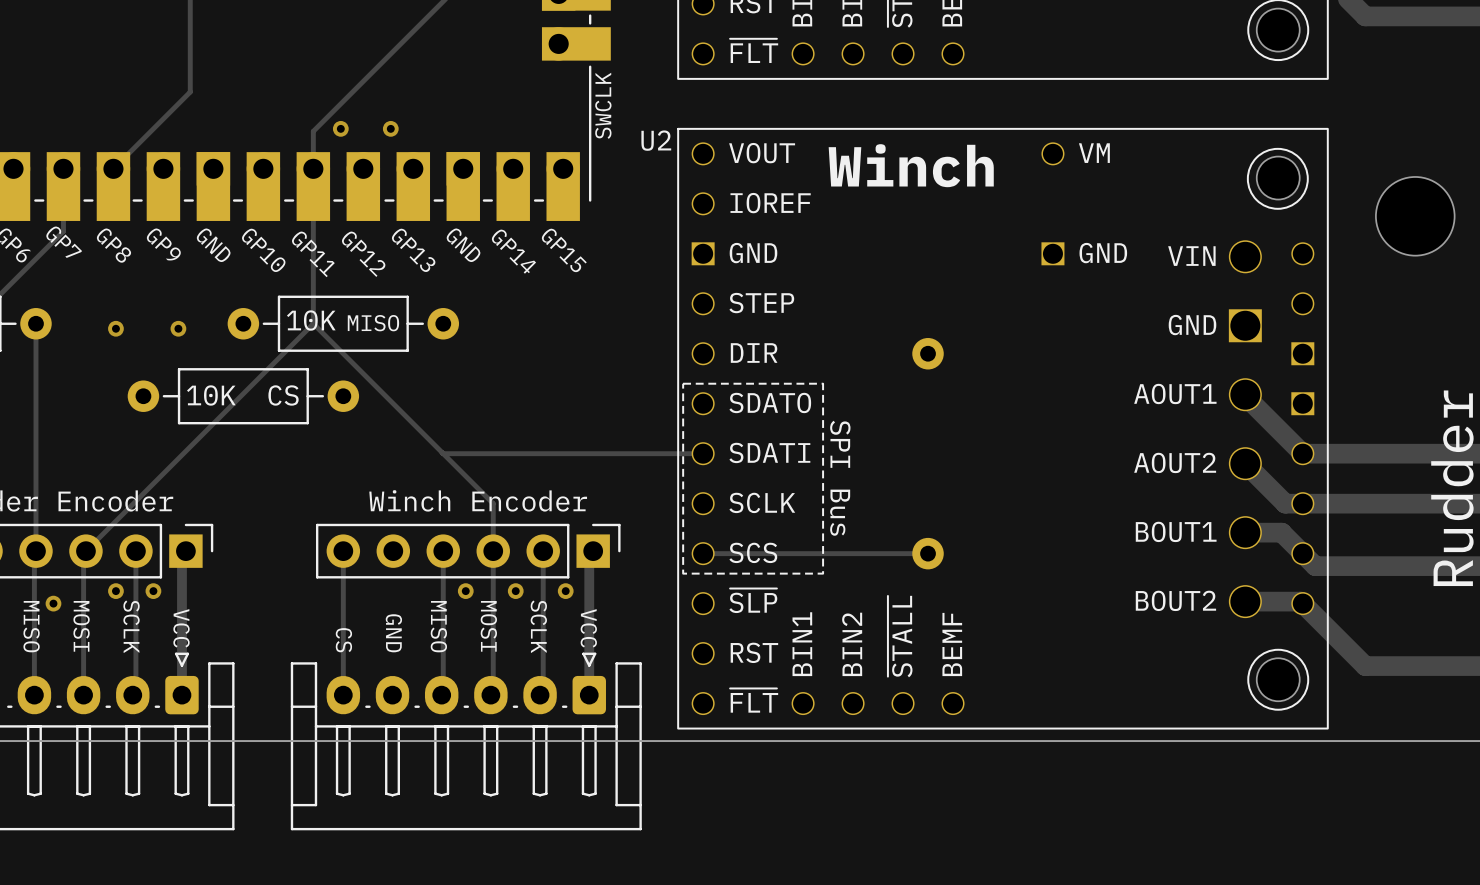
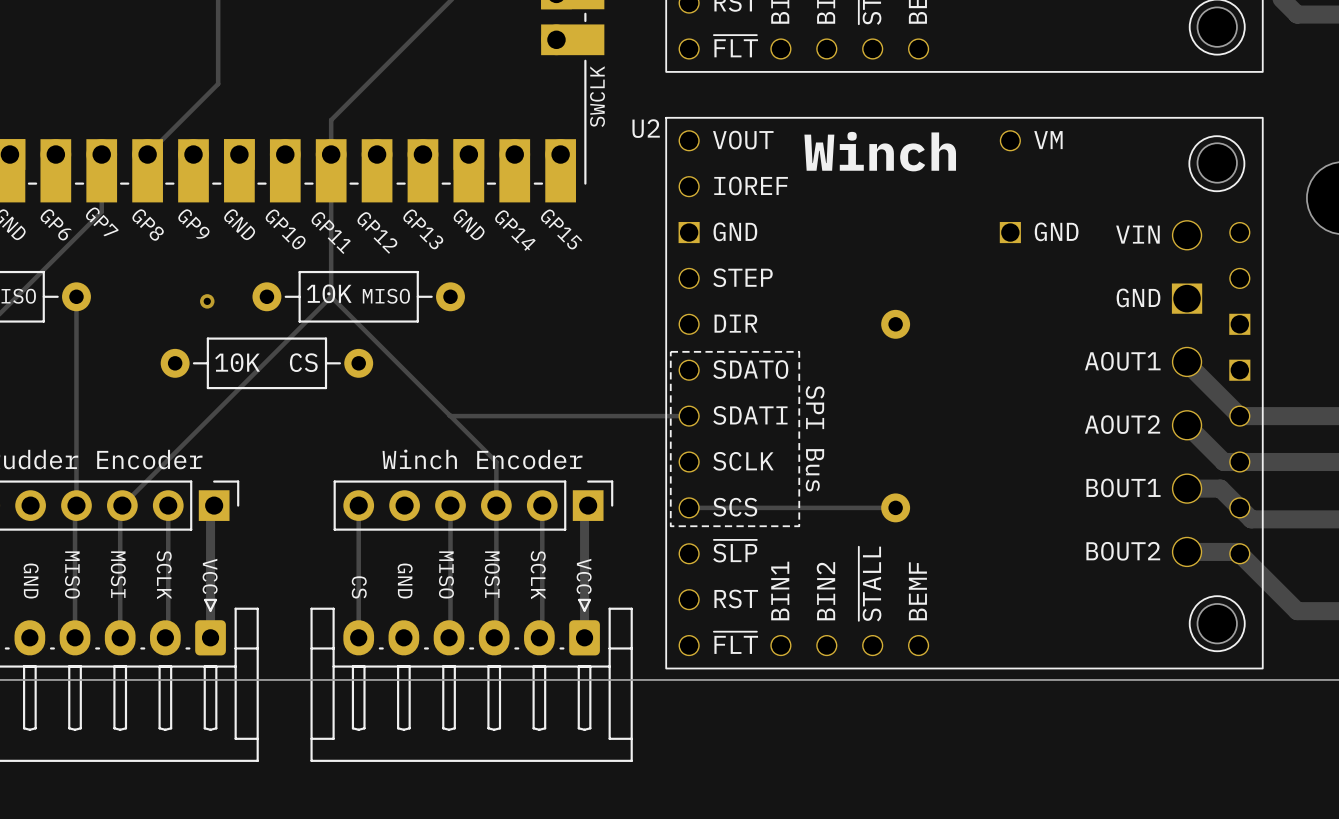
via: (340, 128) -> none
via: (390, 128) -> none
via: (115, 328) -> none
via: (115, 591) -> none
via: (153, 591) -> none
via: (465, 591) -> none
via: (515, 591) -> none
via: (565, 591) -> none
via: (53, 603) -> none

